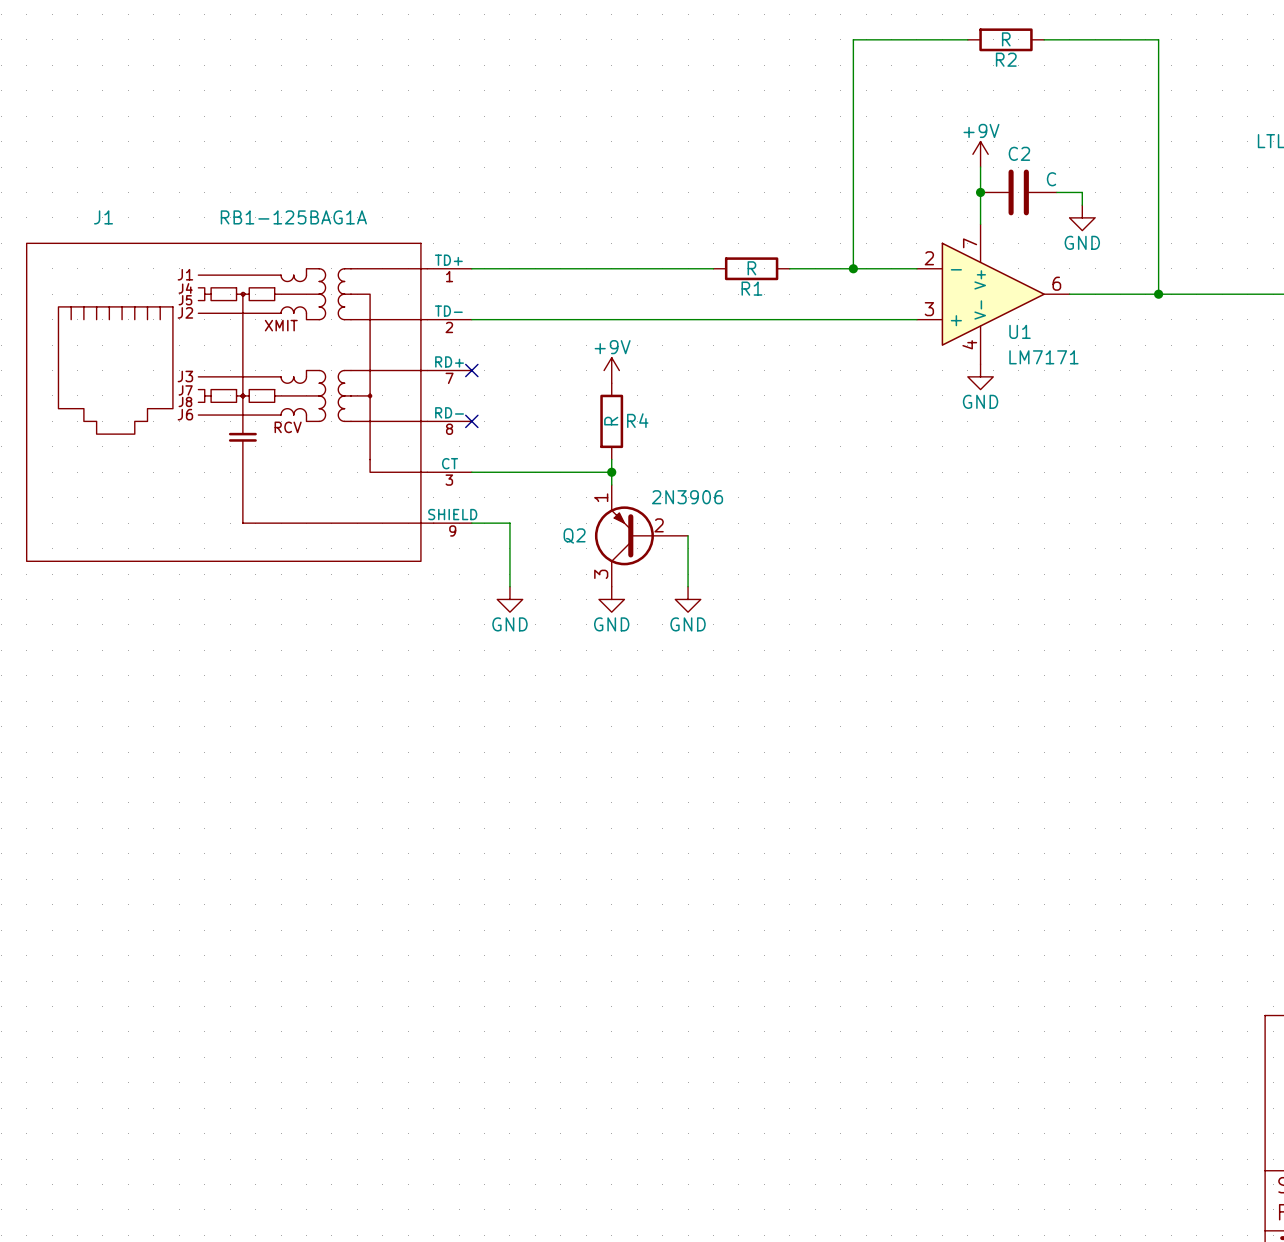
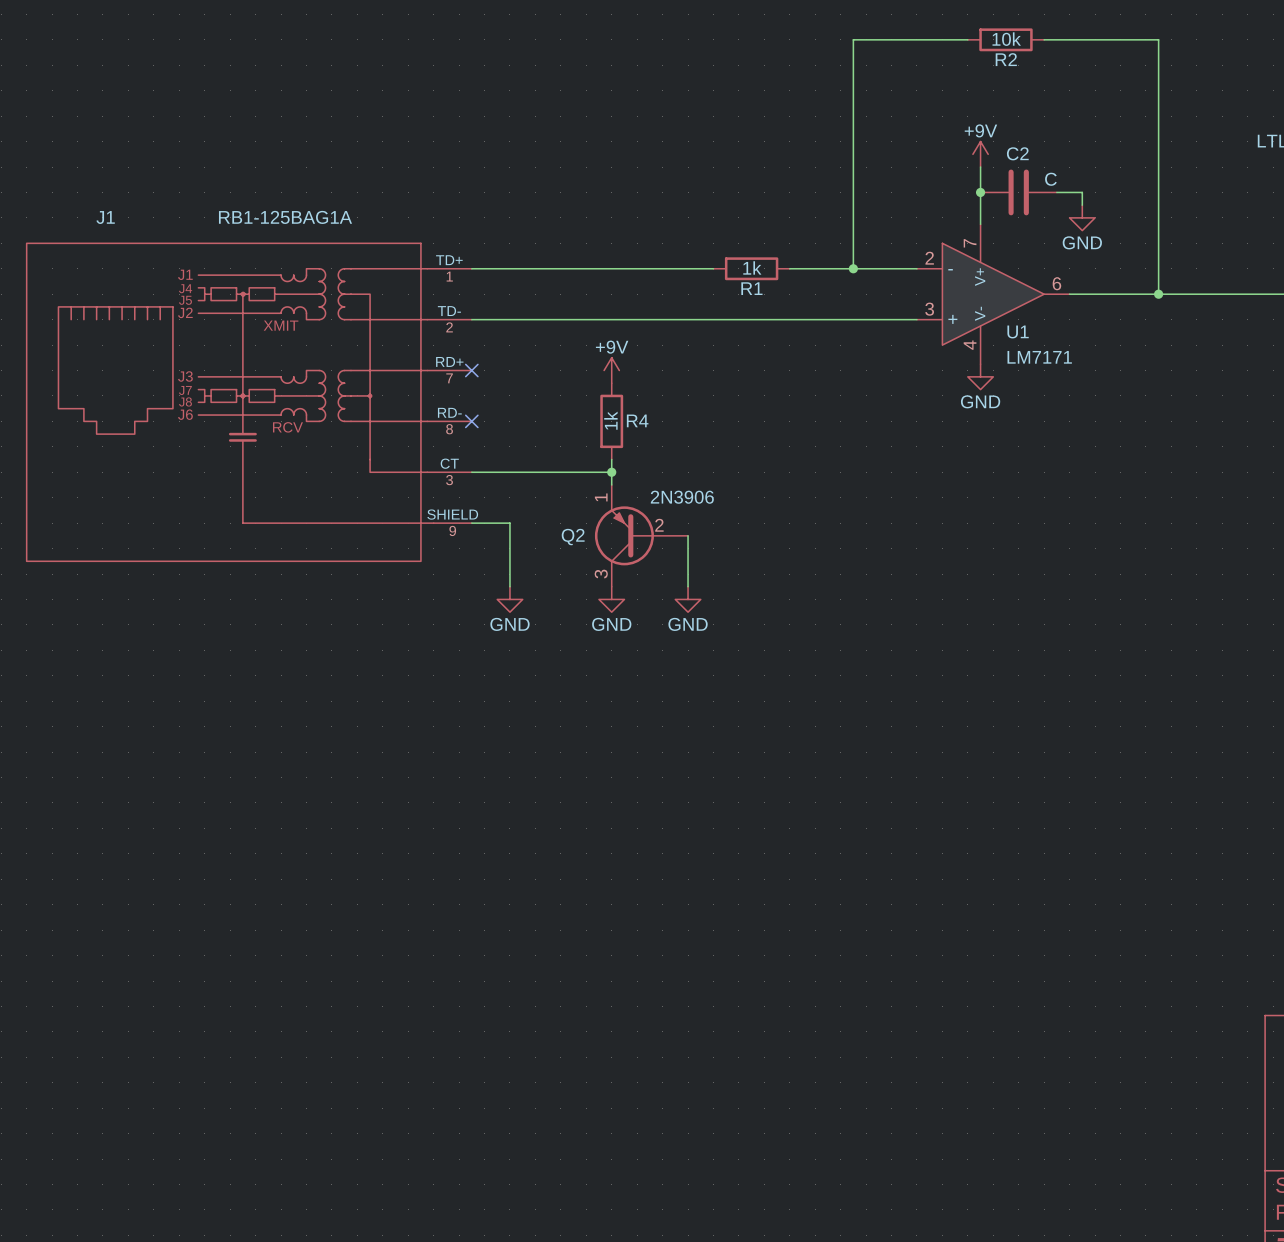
R2 value: R (1006, 39) -> 10k (1006, 39)
R1 value: R (751, 268) -> 1k (752, 267)
R4 value: R (611, 421) -> 1k (610, 420)

